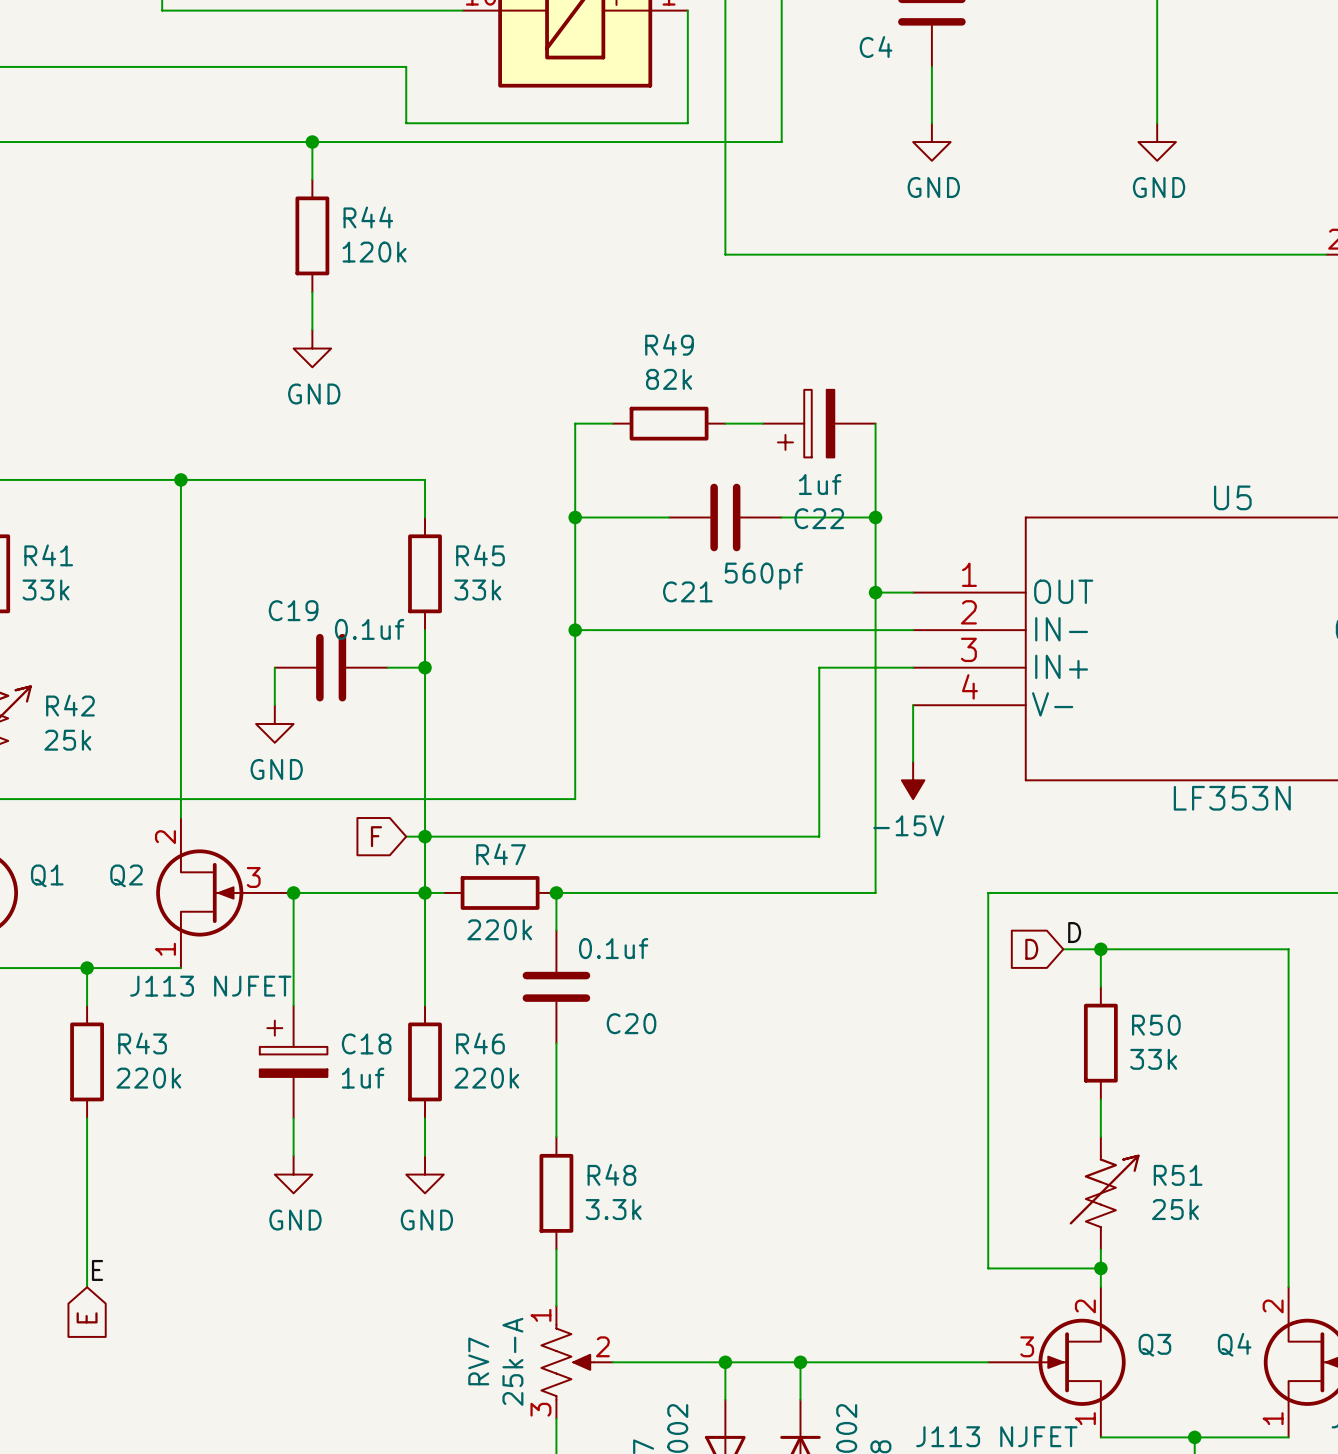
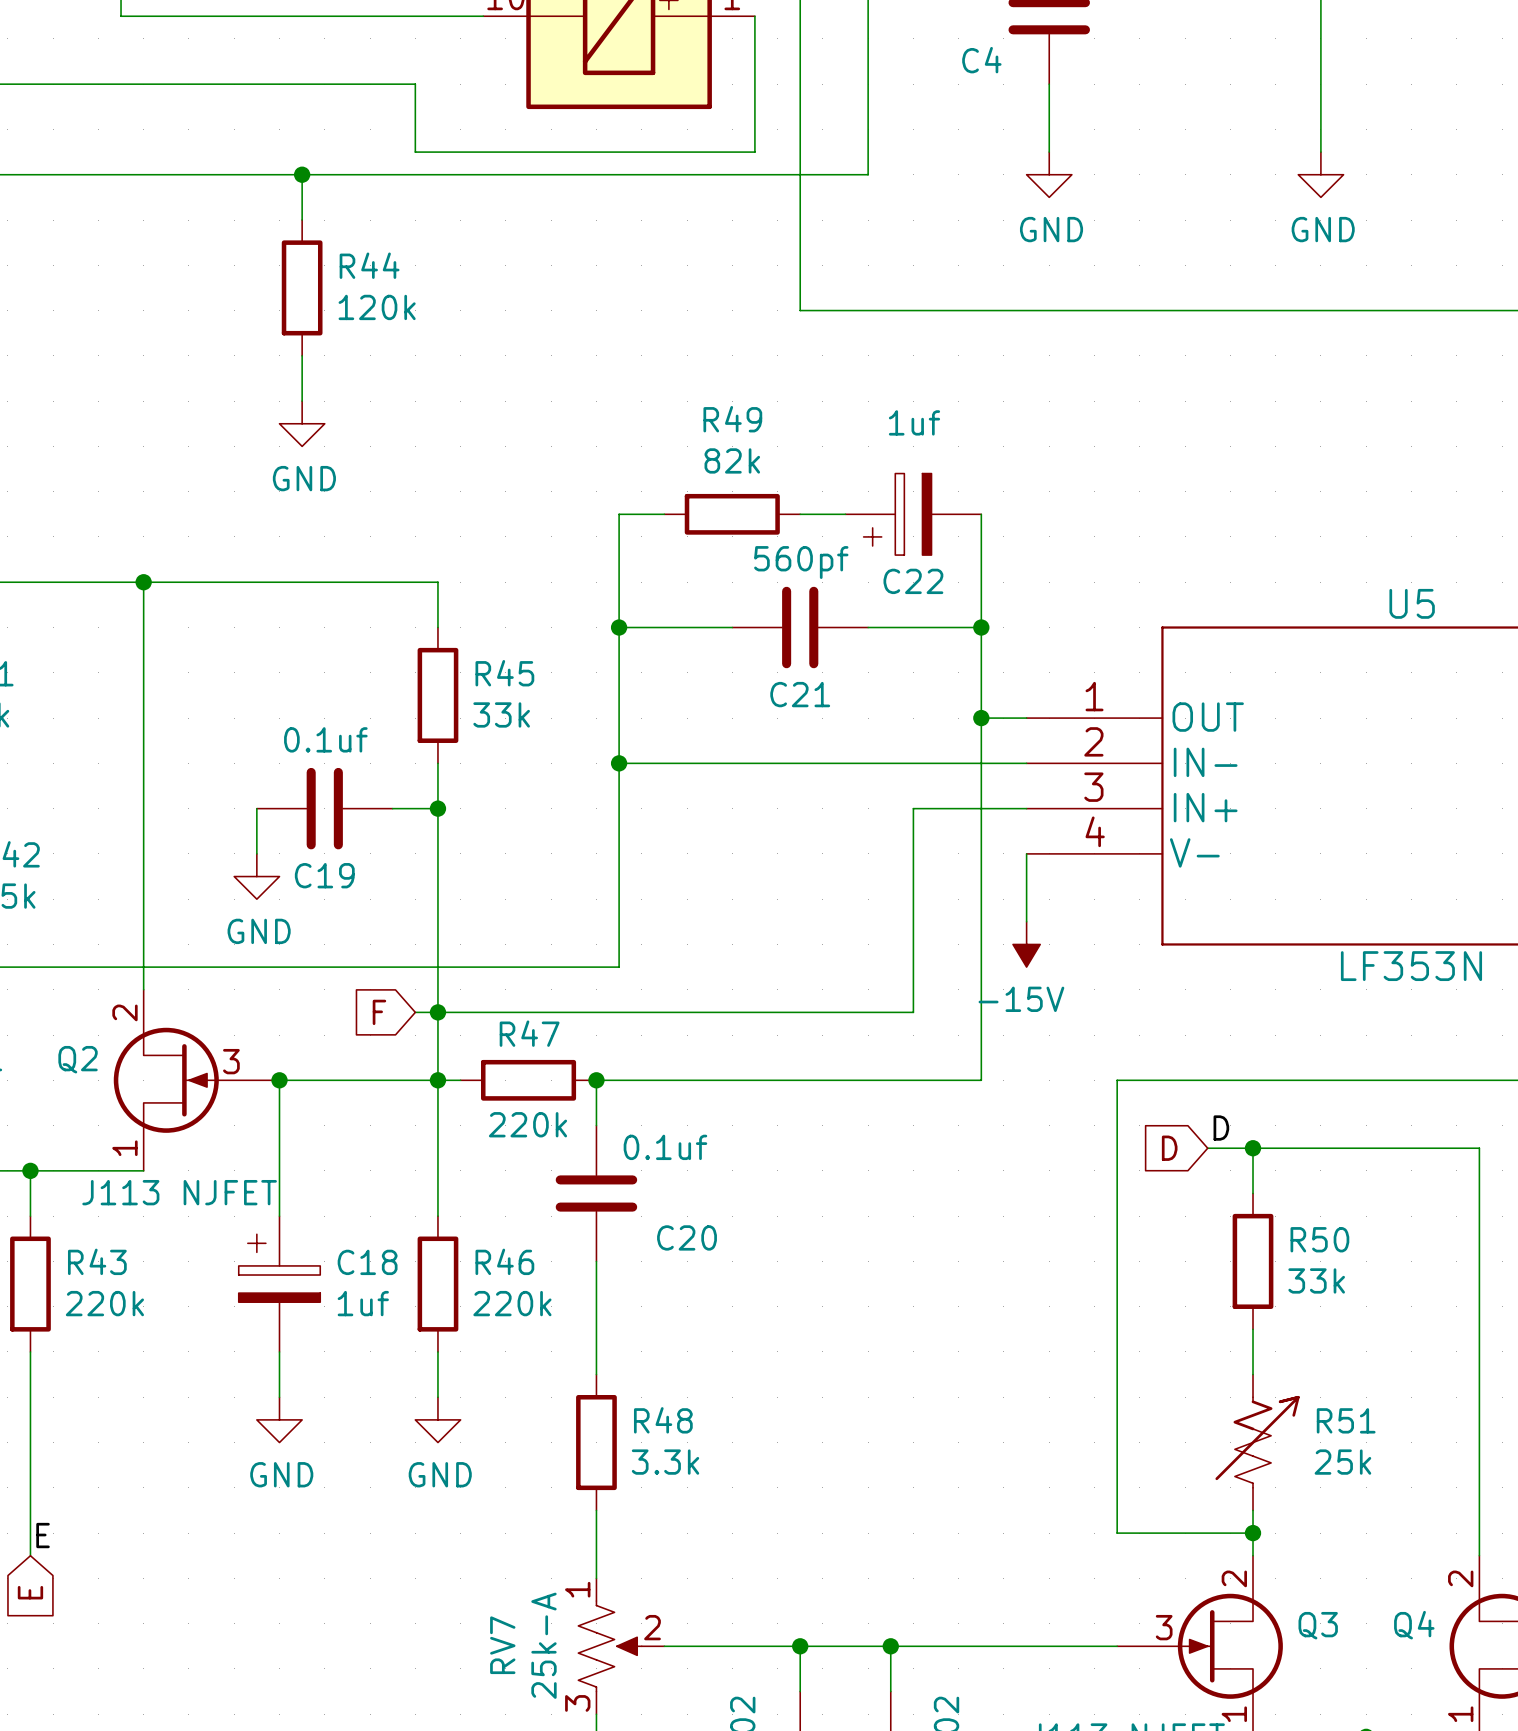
C22 value position: 1uf (820, 484) -> 1uf (914, 422)
C22 name position: C22 (819, 518) -> C22 (913, 581)
C21 value position: 560pf (763, 576) -> 560pf (801, 562)
C21 name position: C21 (687, 591) -> C21 (800, 694)
C19 name position: C19 (293, 610) -> C19 (324, 875)
C19 value position: 0.1uf (369, 629) -> 0.1uf (325, 739)

